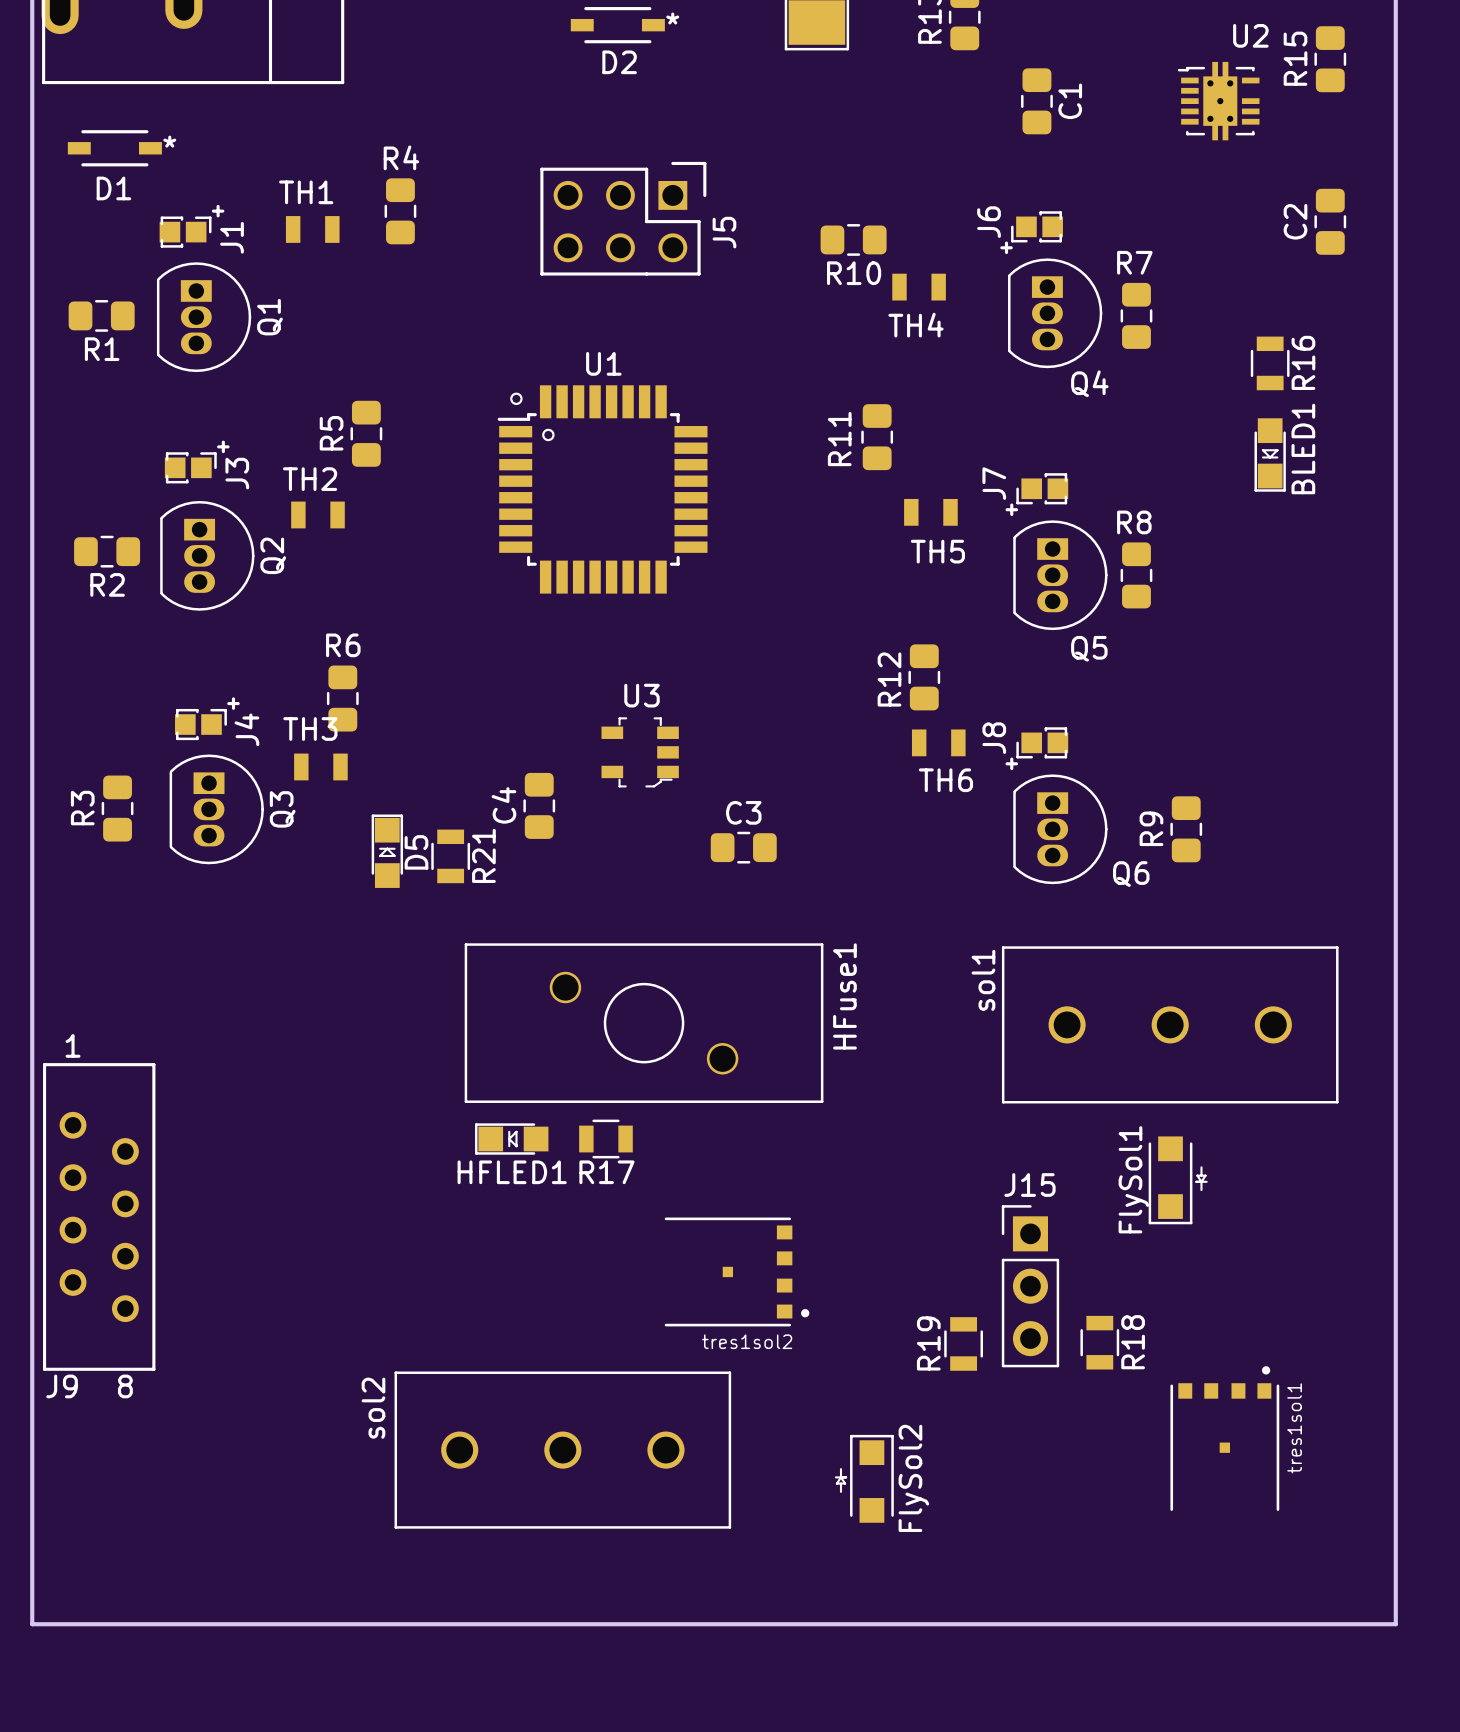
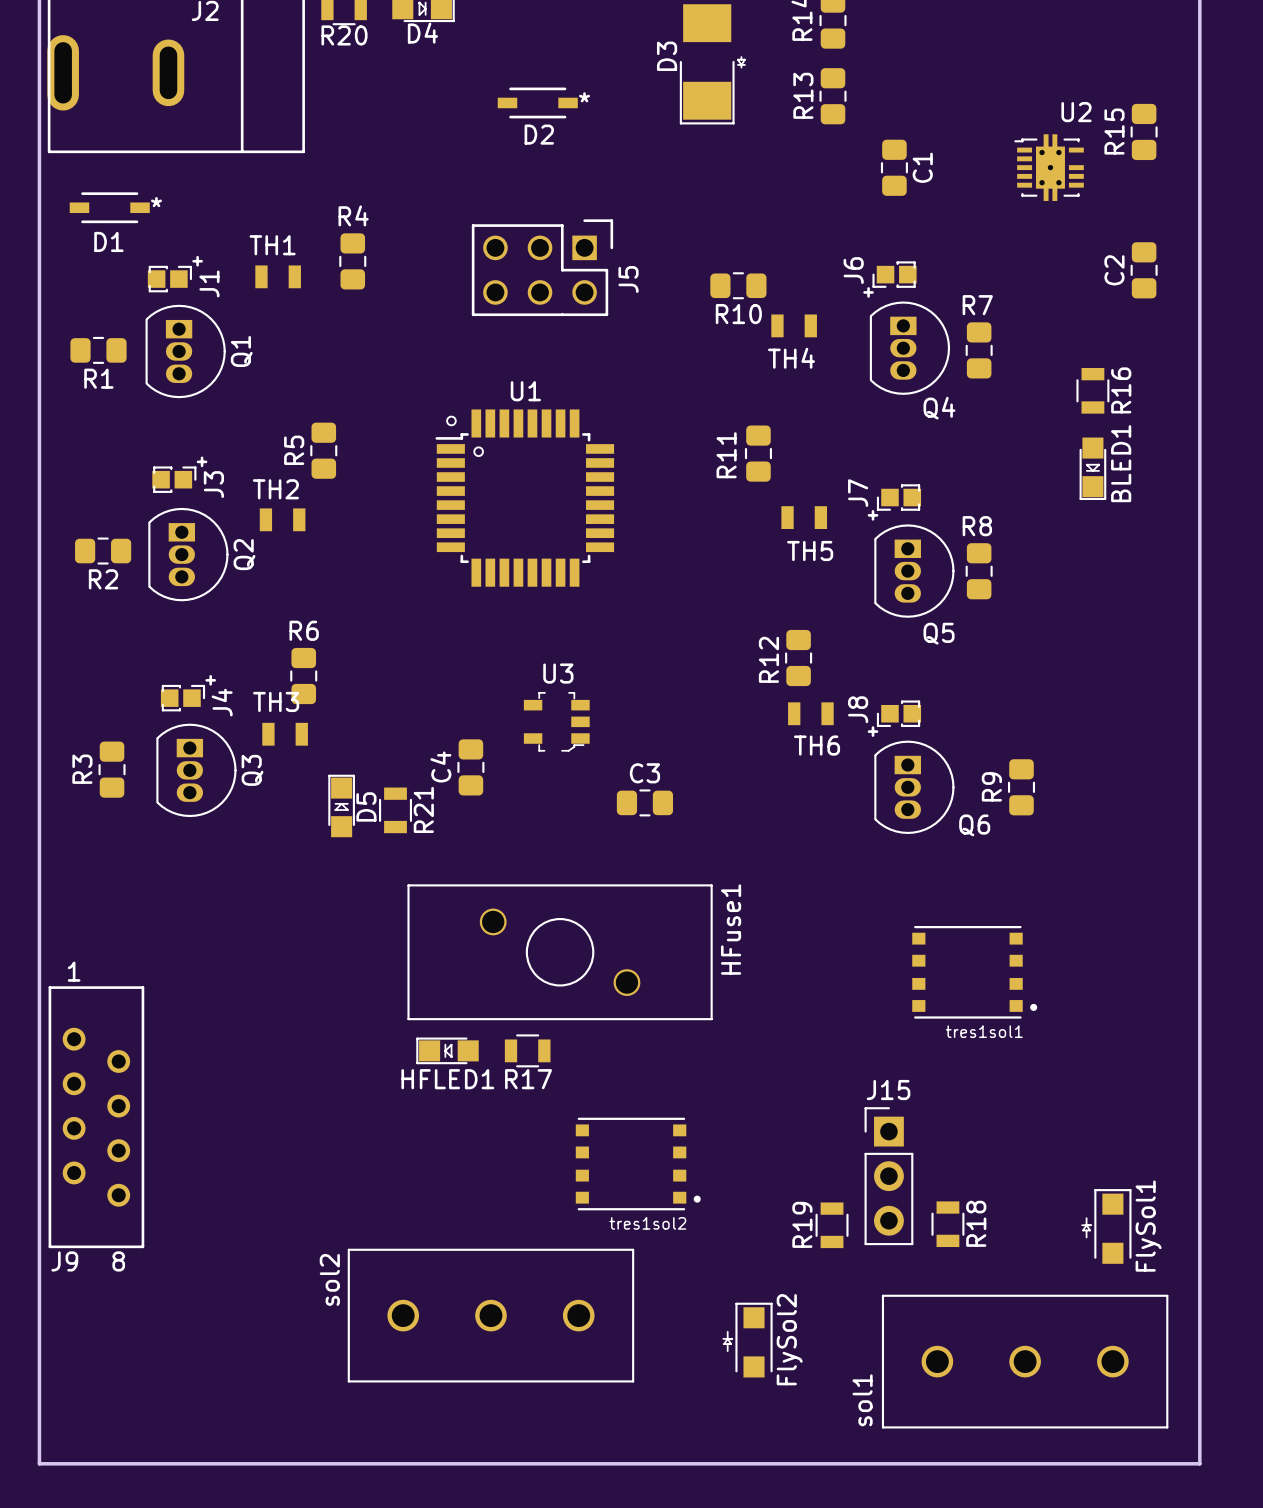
sol1 name position: sol1 (983, 980) -> sol1 (862, 1400)
sol1 position: (1170, 1024) -> (1025, 1361)
FlySol1 rotation: 0° (1178, 1180) -> 180° (1106, 1226)
FlySol1 position: (1178, 1180) -> (1106, 1226)
tres1sol2 footprint: [664, 1217, 810, 1327] -> [575, 1117, 701, 1211]
tres1sol1 footprint: [1170, 1366, 1280, 1511] -> [912, 925, 1038, 1019]
tres1sol1 name position: tres1sol1 (1294, 1428) -> tres1sol1 (984, 1031)

